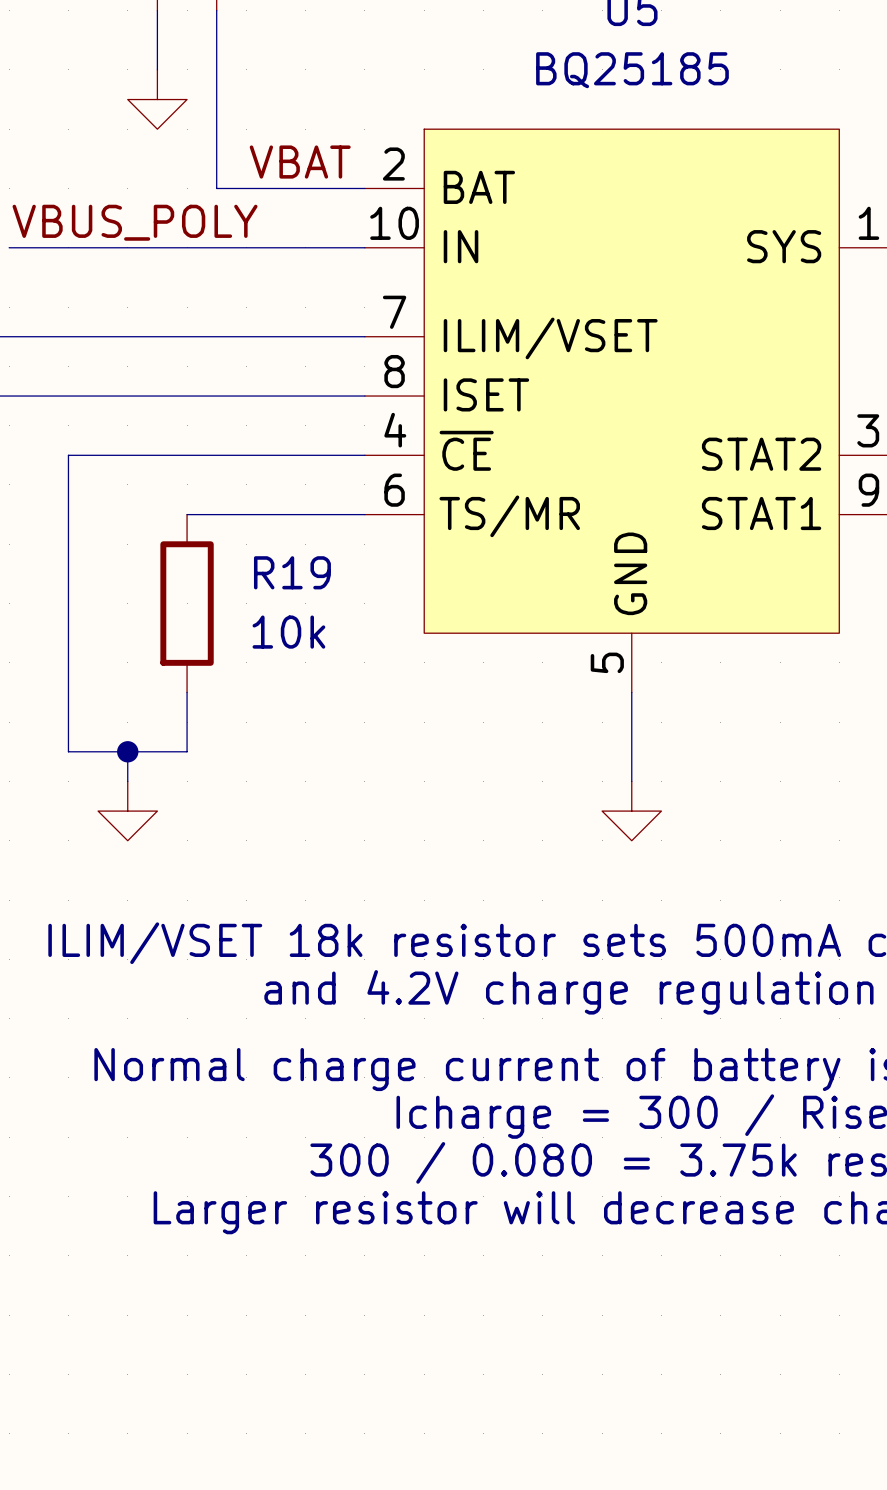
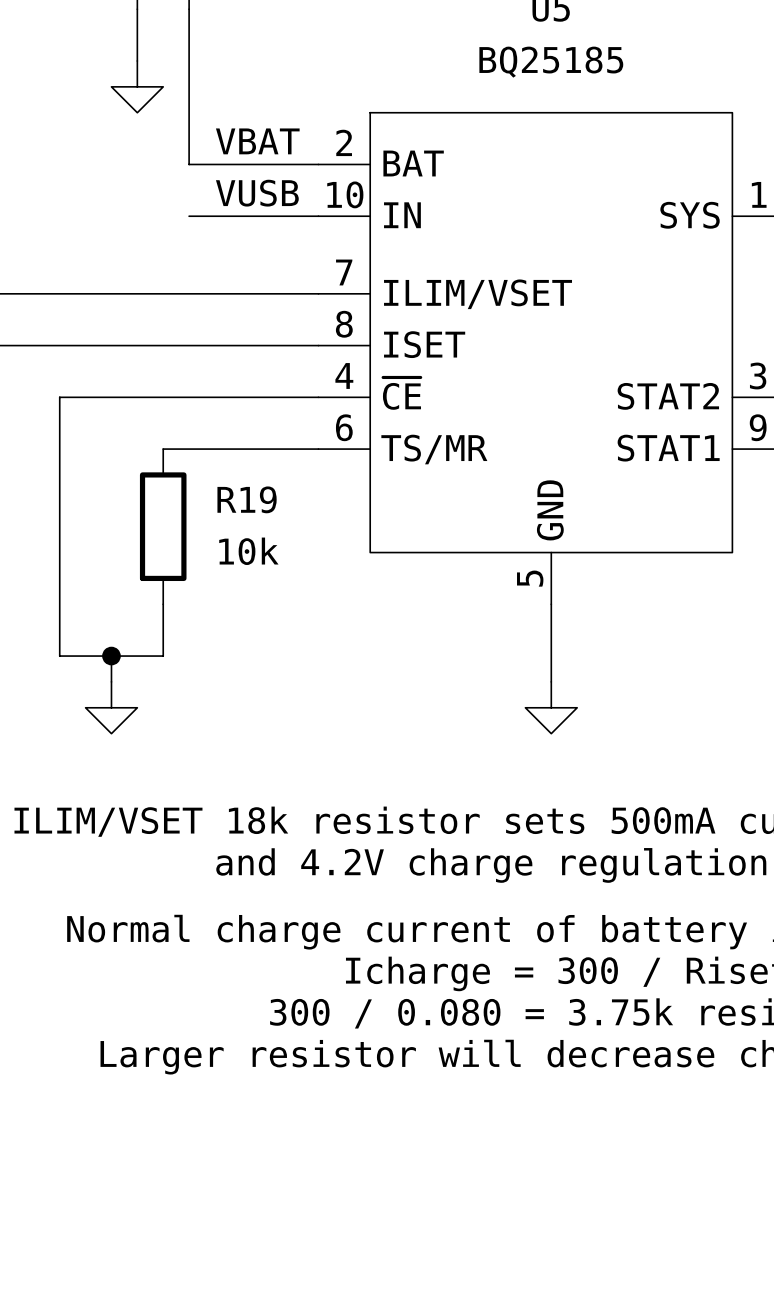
label: none -> VUSB (257, 193)
label: VBUS_POLY (135, 222) -> none
wire: (9, 247) (216, 247) -> none

